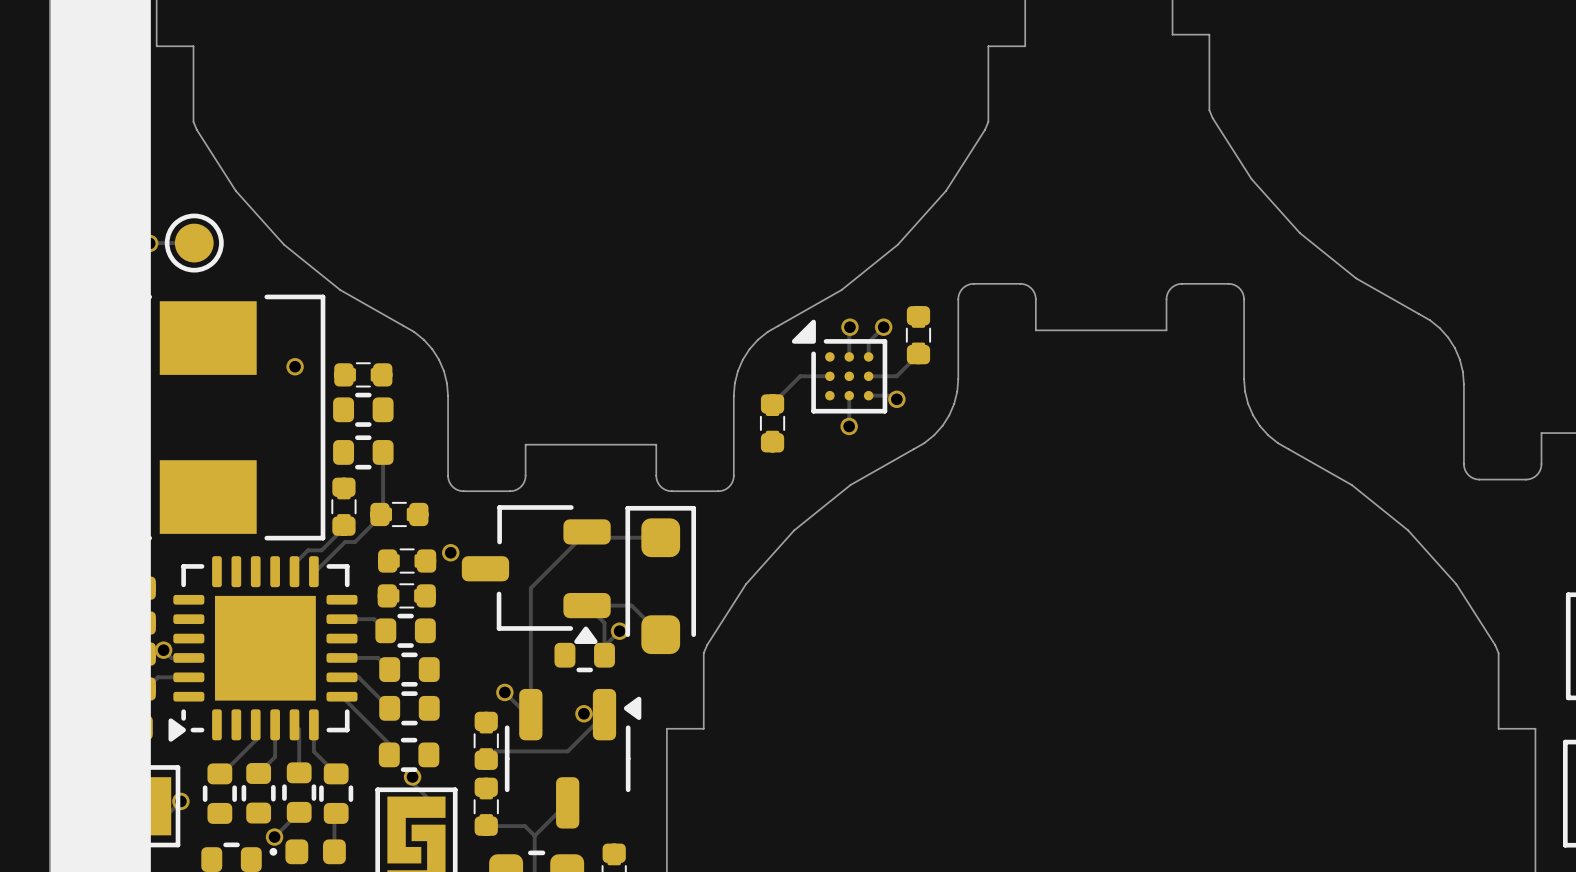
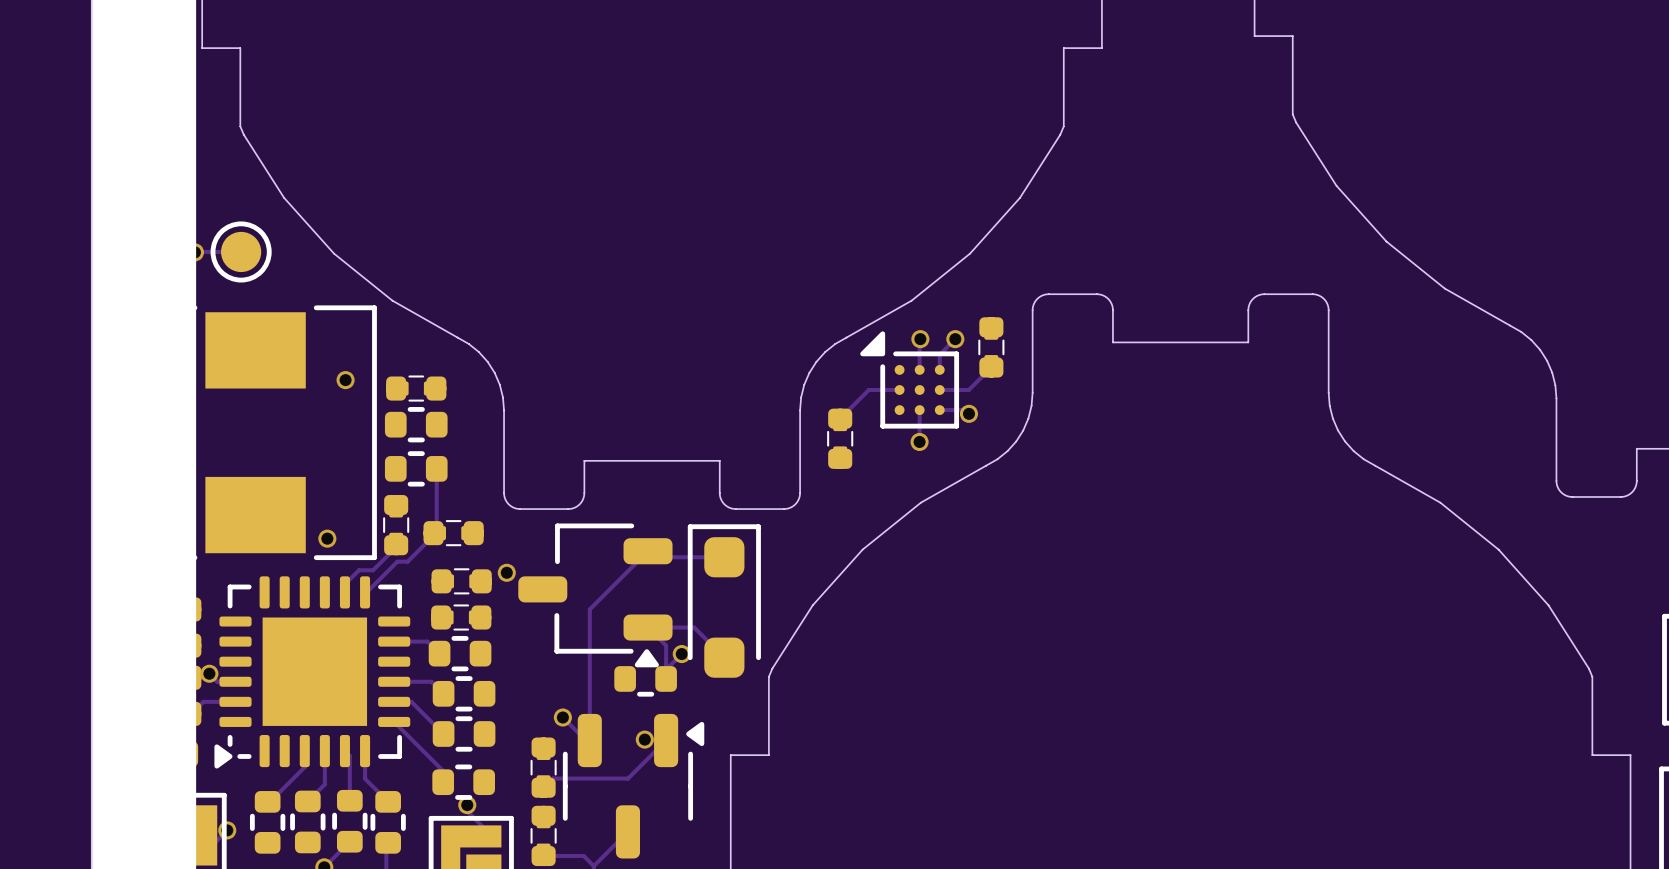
via: none -> (327, 538)

